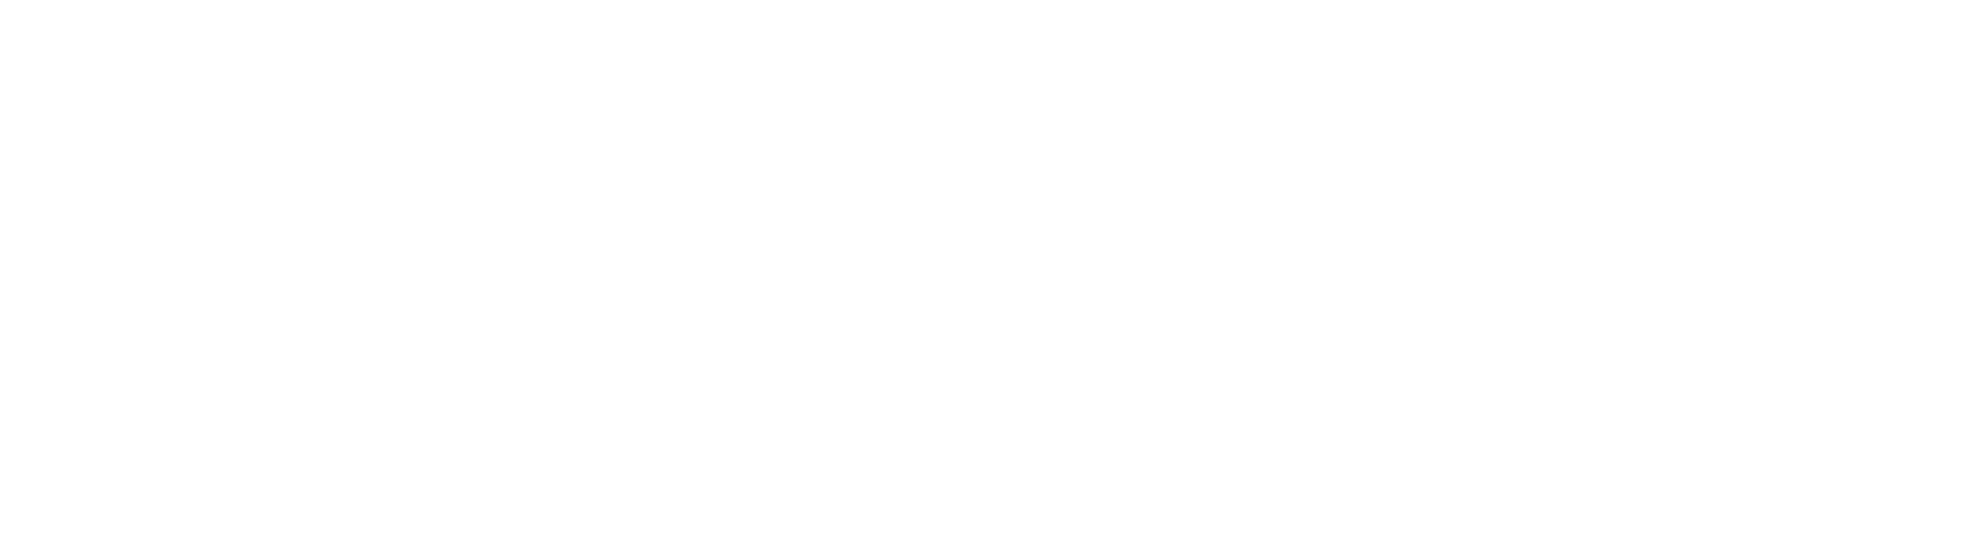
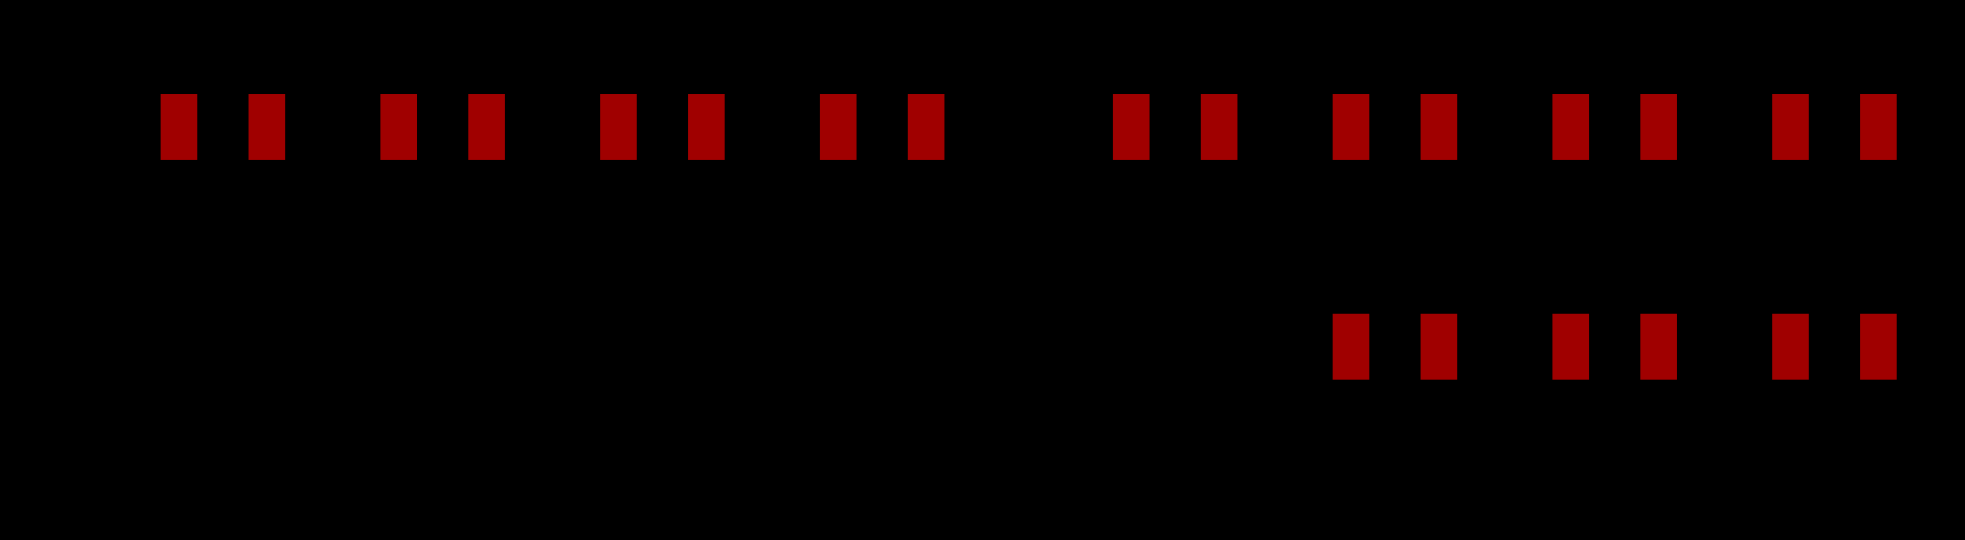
part: none -> (222, 126)
part: none -> (442, 126)
part: none -> (662, 126)
part: none -> (882, 126)
part: none -> (1175, 126)
part: none -> (1394, 126)
part: none -> (1614, 126)
part: none -> (1834, 126)
part: none -> (1394, 346)
part: none -> (1614, 346)
part: none -> (1834, 346)

